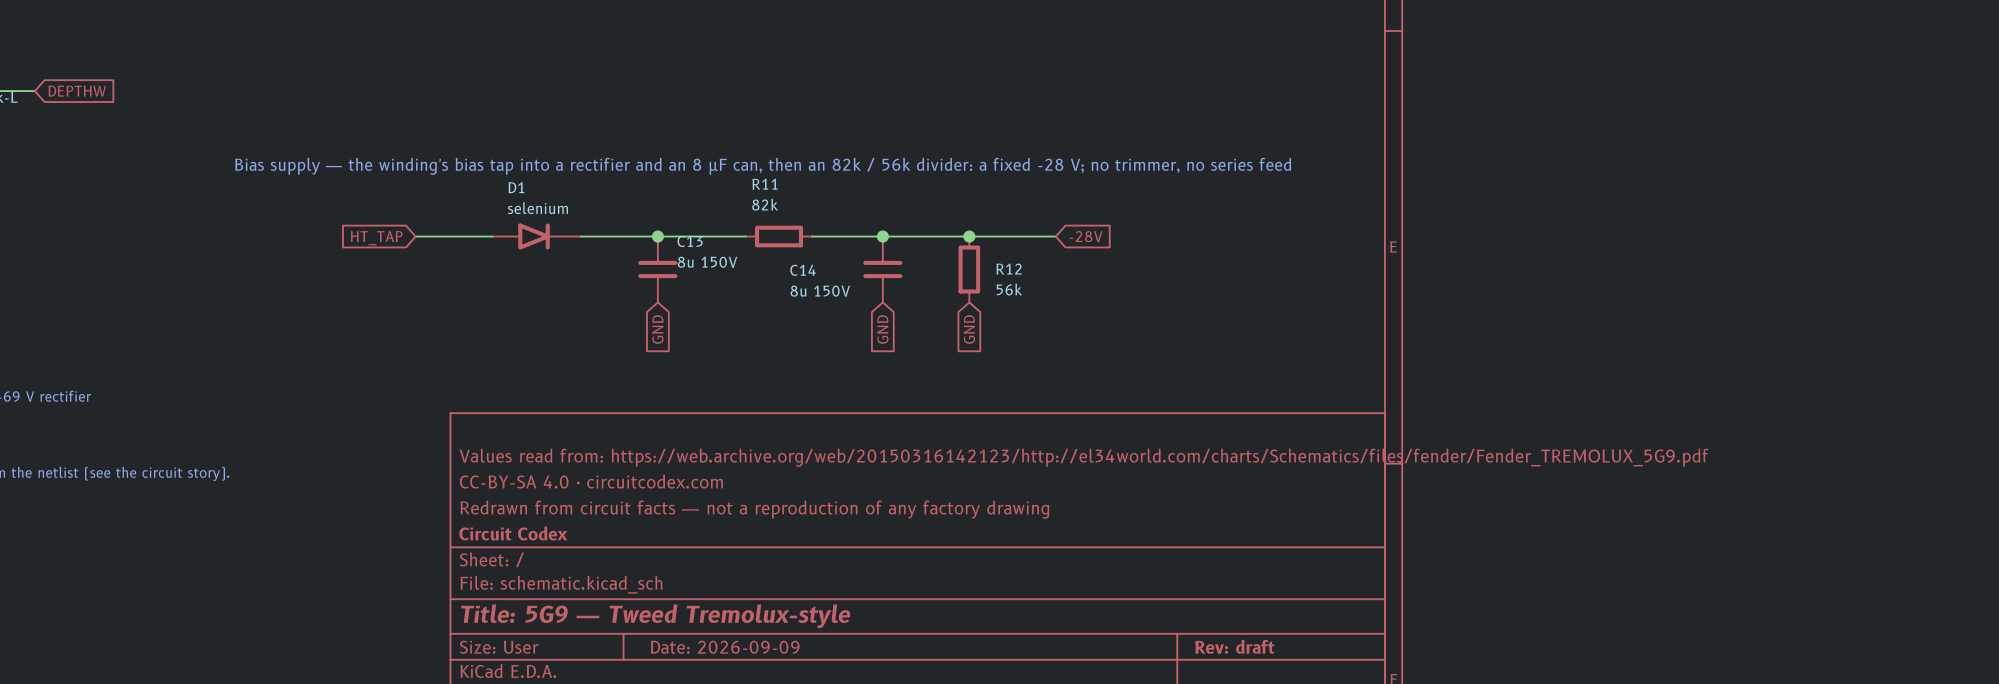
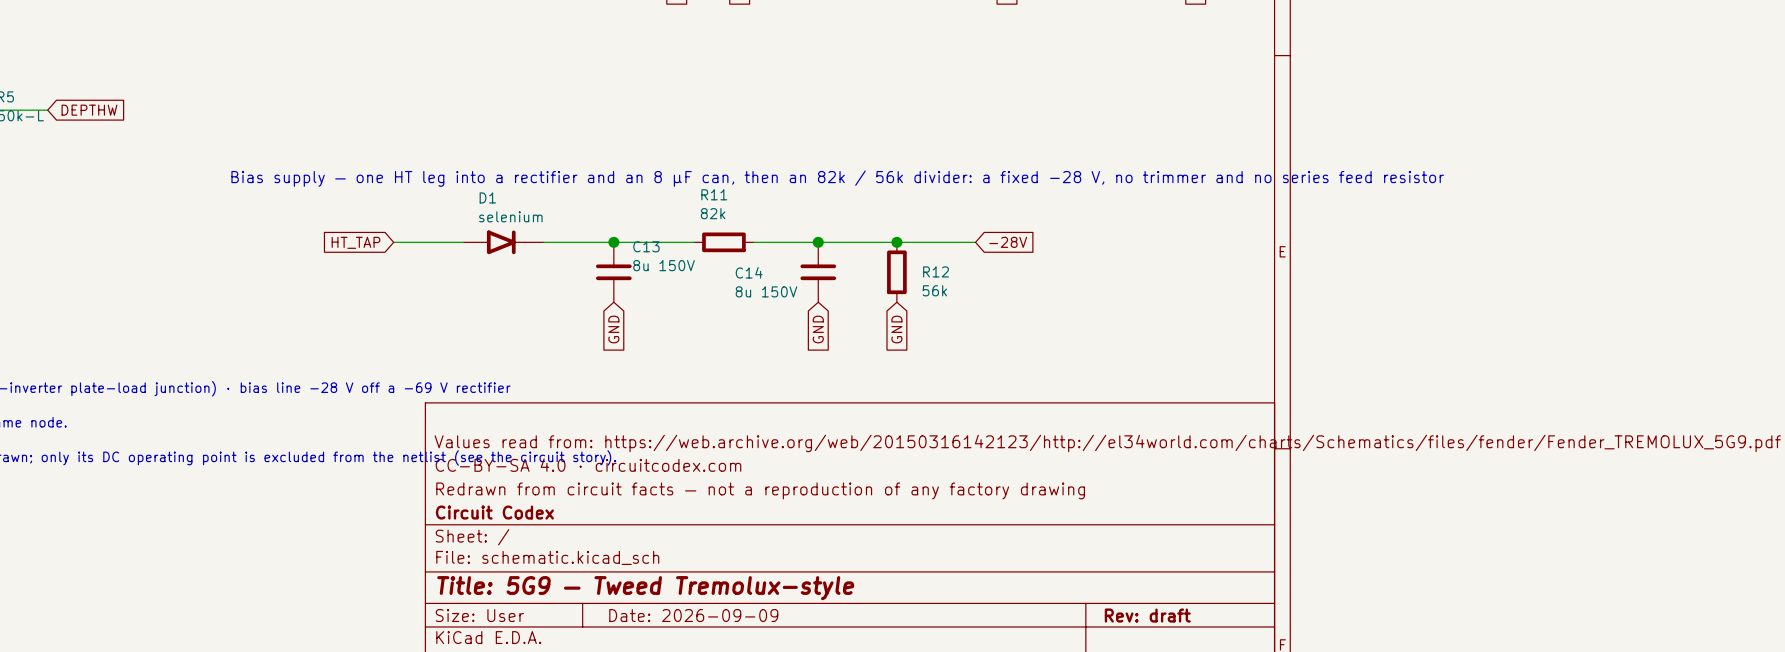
text: Bias supply — the winding's bias tap into a rectifier and an 8 µF can, then an 82k / 56k divider: a fixed -28 V; no trimmer, no series feed (763, 166) -> Bias supply — one HT leg into a rectifier and an 8 µF can, then an 82k / 56k divider: a fixed -28 V, no trimmer and no series feed resistor (837, 178)

